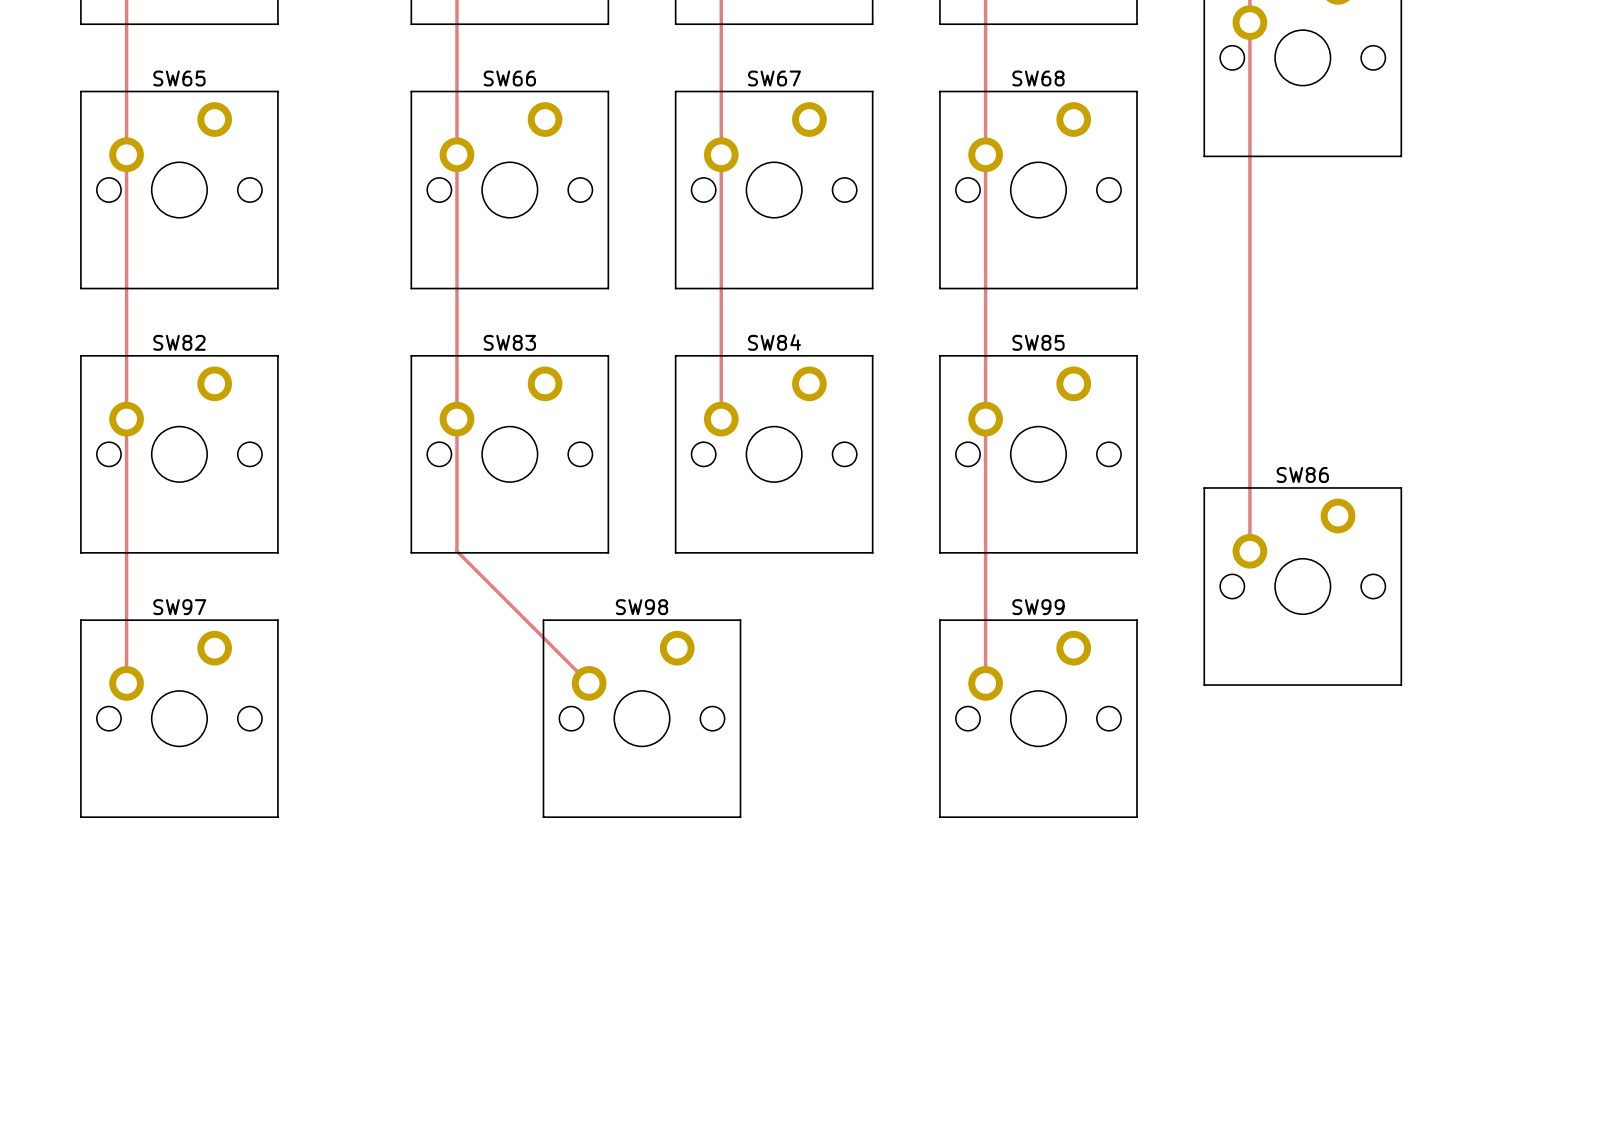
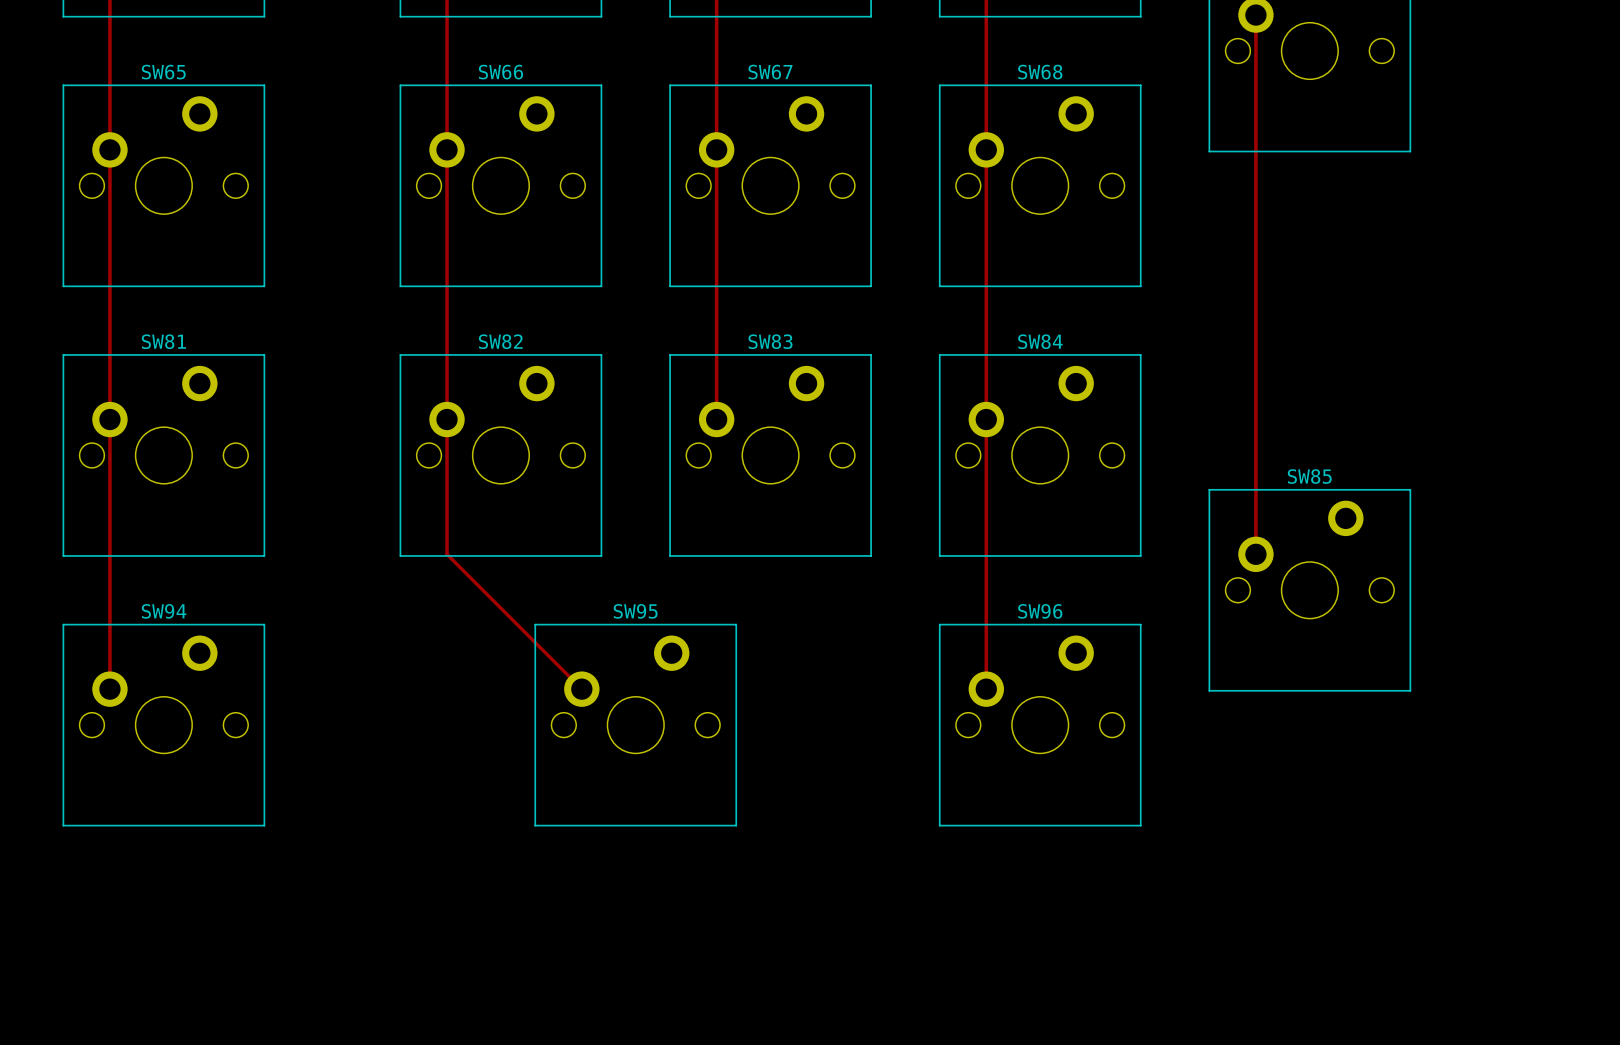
SW82 name: SW82 (179, 342) -> SW81 (163, 341)
SW83 name: SW83 (509, 342) -> SW82 (500, 341)
SW84 name: SW84 (774, 342) -> SW83 (770, 341)
SW85 name: SW85 (1038, 342) -> SW84 (1040, 341)
SW86 name: SW86 (1302, 474) -> SW85 (1309, 476)
SW97 name: SW97 (179, 607) -> SW94 (164, 611)
SW98 name: SW98 (641, 607) -> SW95 (635, 611)
SW99 name: SW99 (1038, 607) -> SW96 (1040, 611)

